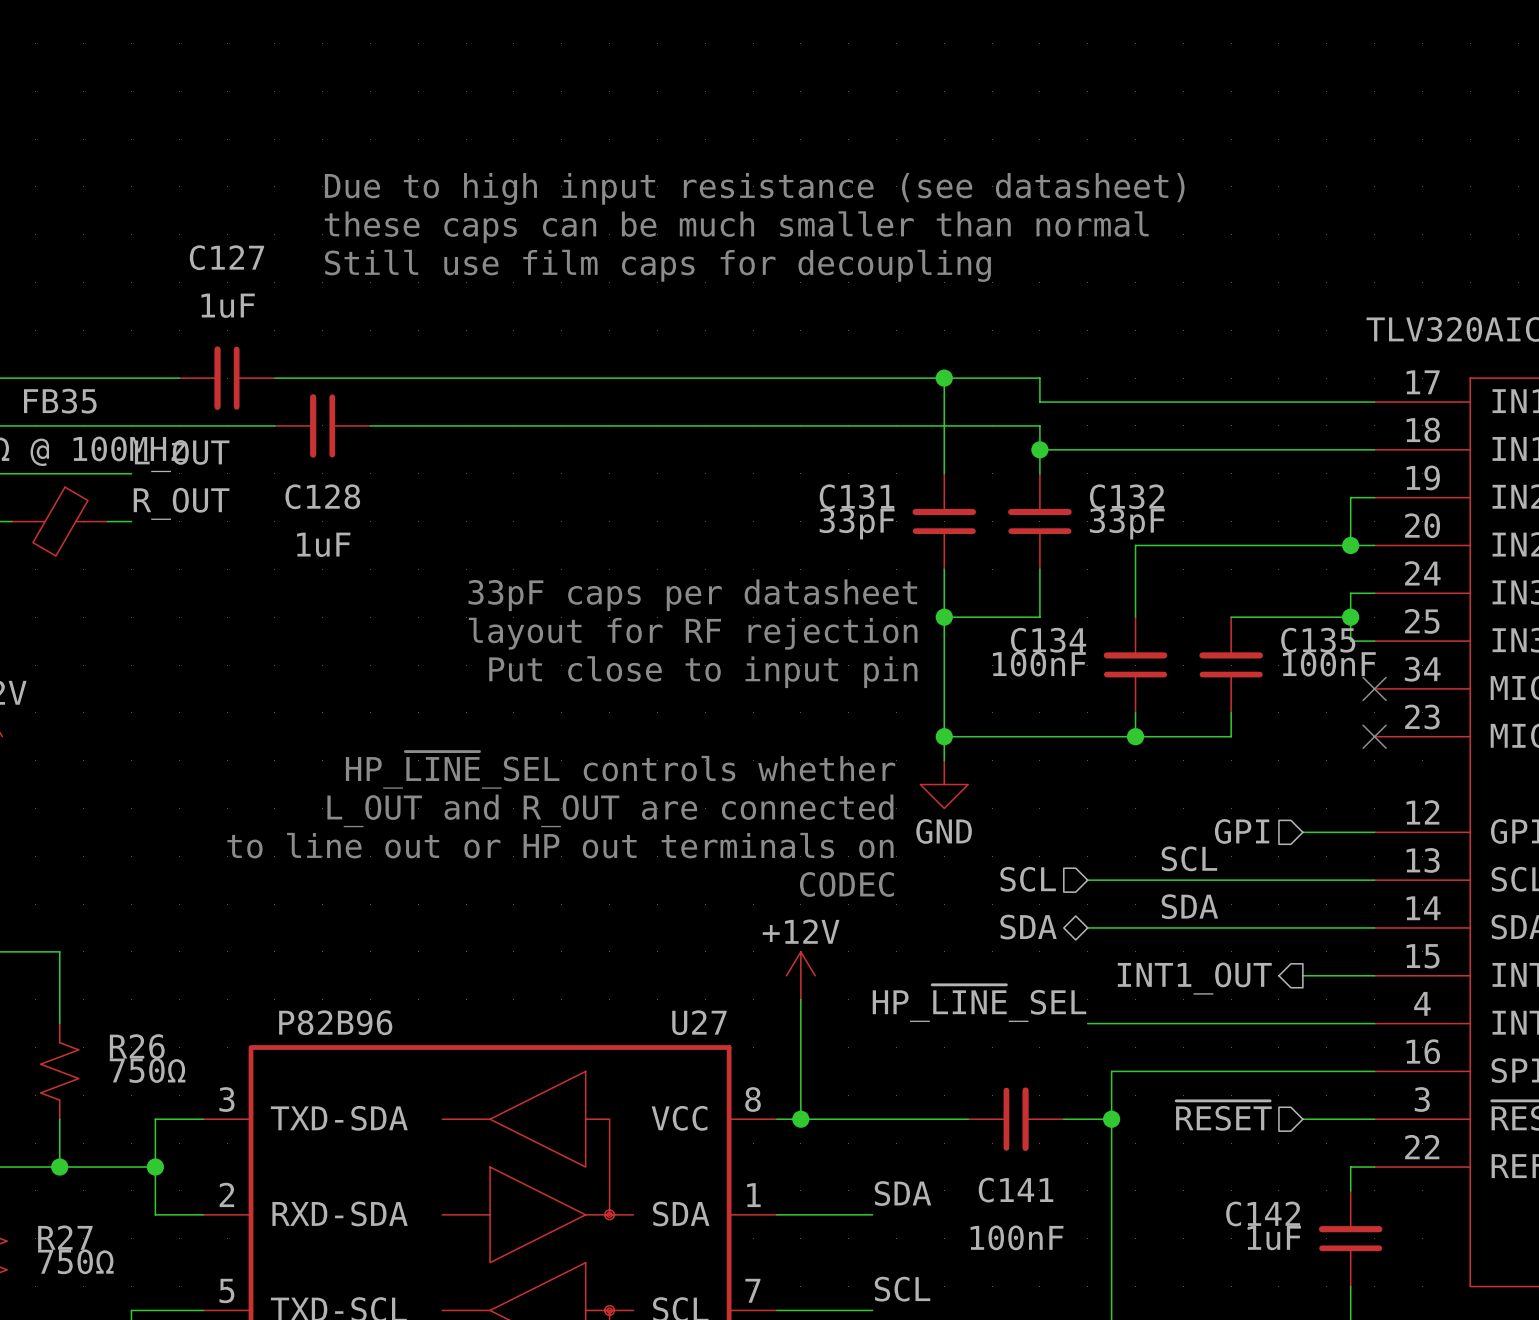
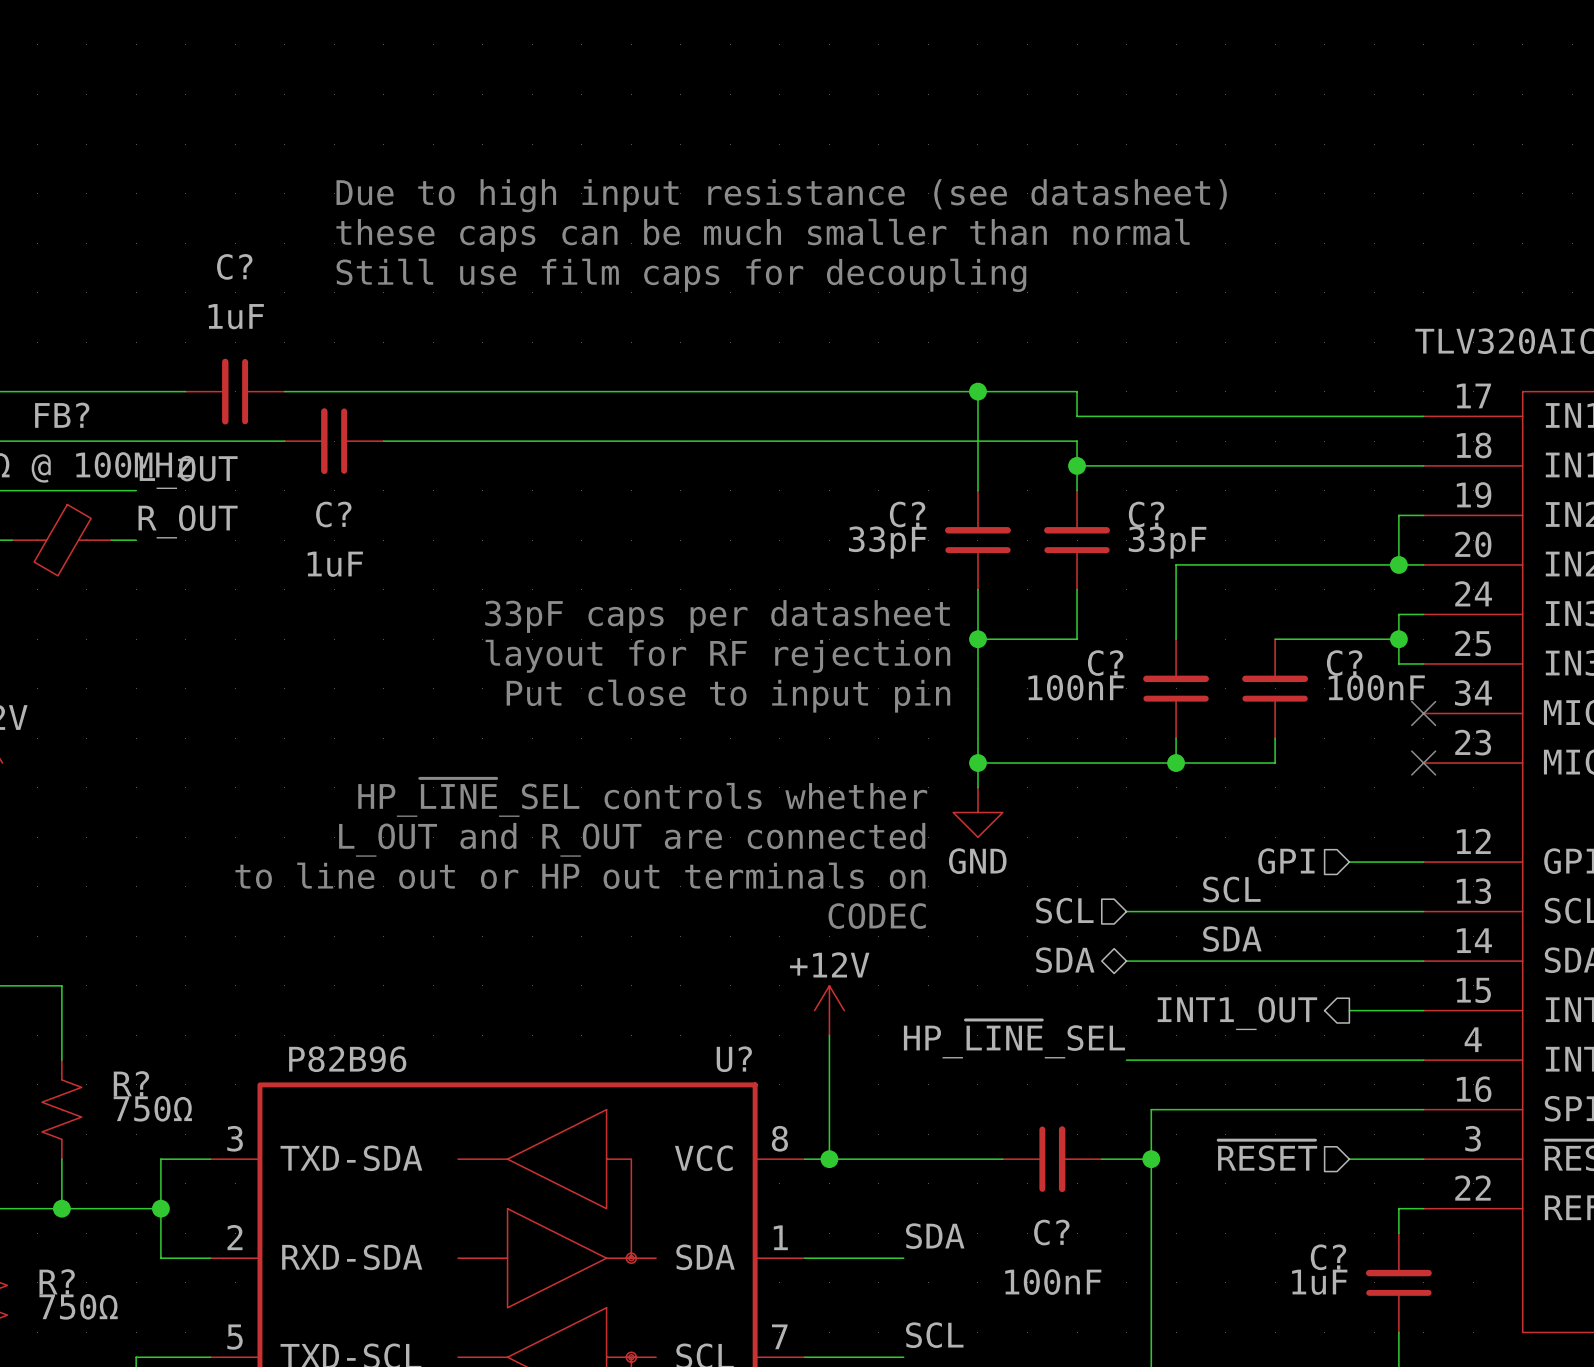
C127 name: C127 (226, 257) -> C? (234, 266)
FB35 name: FB35 (60, 401) -> FB? (62, 415)
C128 name: C128 (322, 496) -> C? (333, 514)
C131 name: C131 (856, 496) -> C? (907, 514)
C132 name: C132 (1126, 496) -> C? (1146, 514)
C134 name: C134 (1048, 640) -> C? (1105, 663)
C135 name: C135 (1318, 640) -> C? (1344, 663)
U27 name: U27 (699, 1022) -> U? (734, 1059)
R26 name: R26 (137, 1046) -> R? (131, 1083)
C141 name: C141 (1015, 1190) -> C? (1051, 1232)
C142 name: C142 (1263, 1213) -> C? (1328, 1257)
R27 name: R27 (65, 1237) -> R? (57, 1281)

